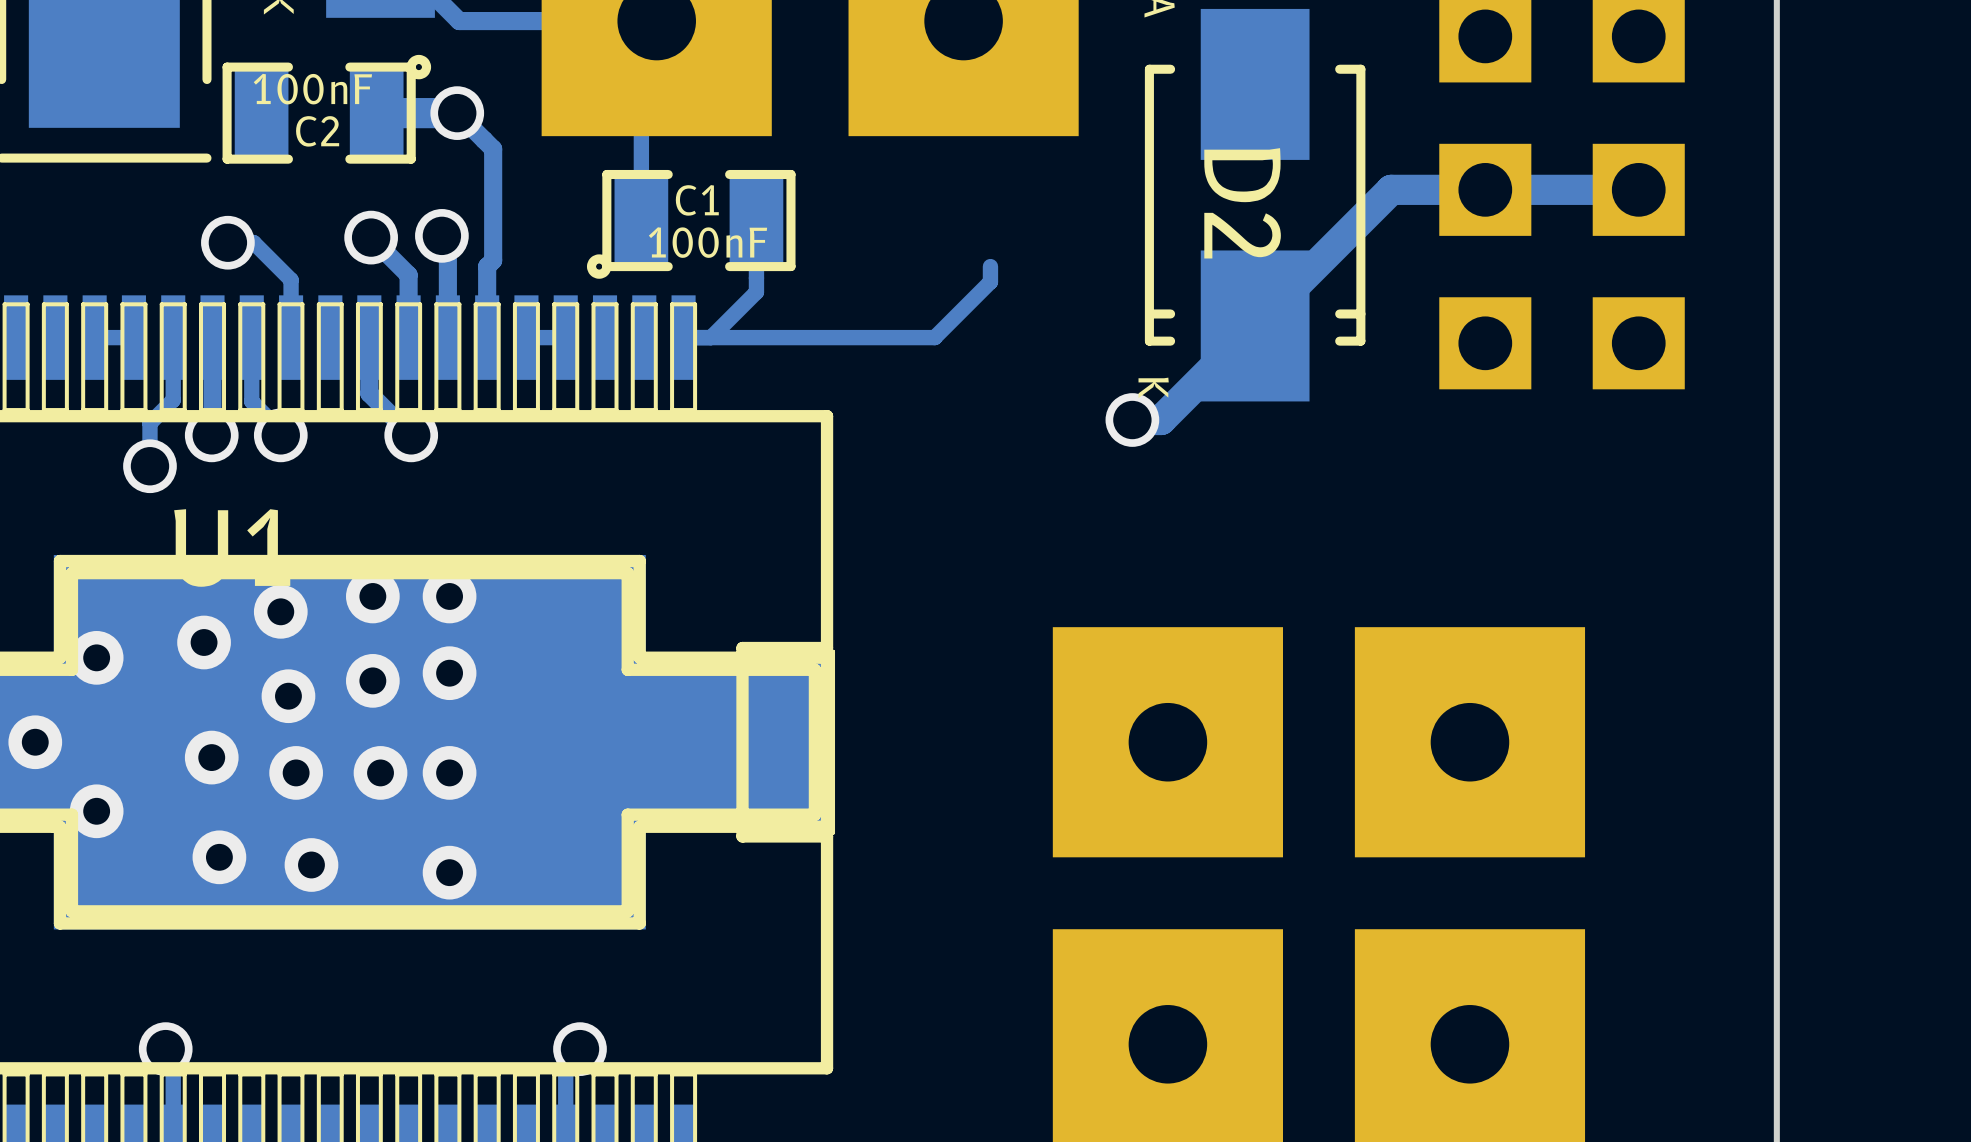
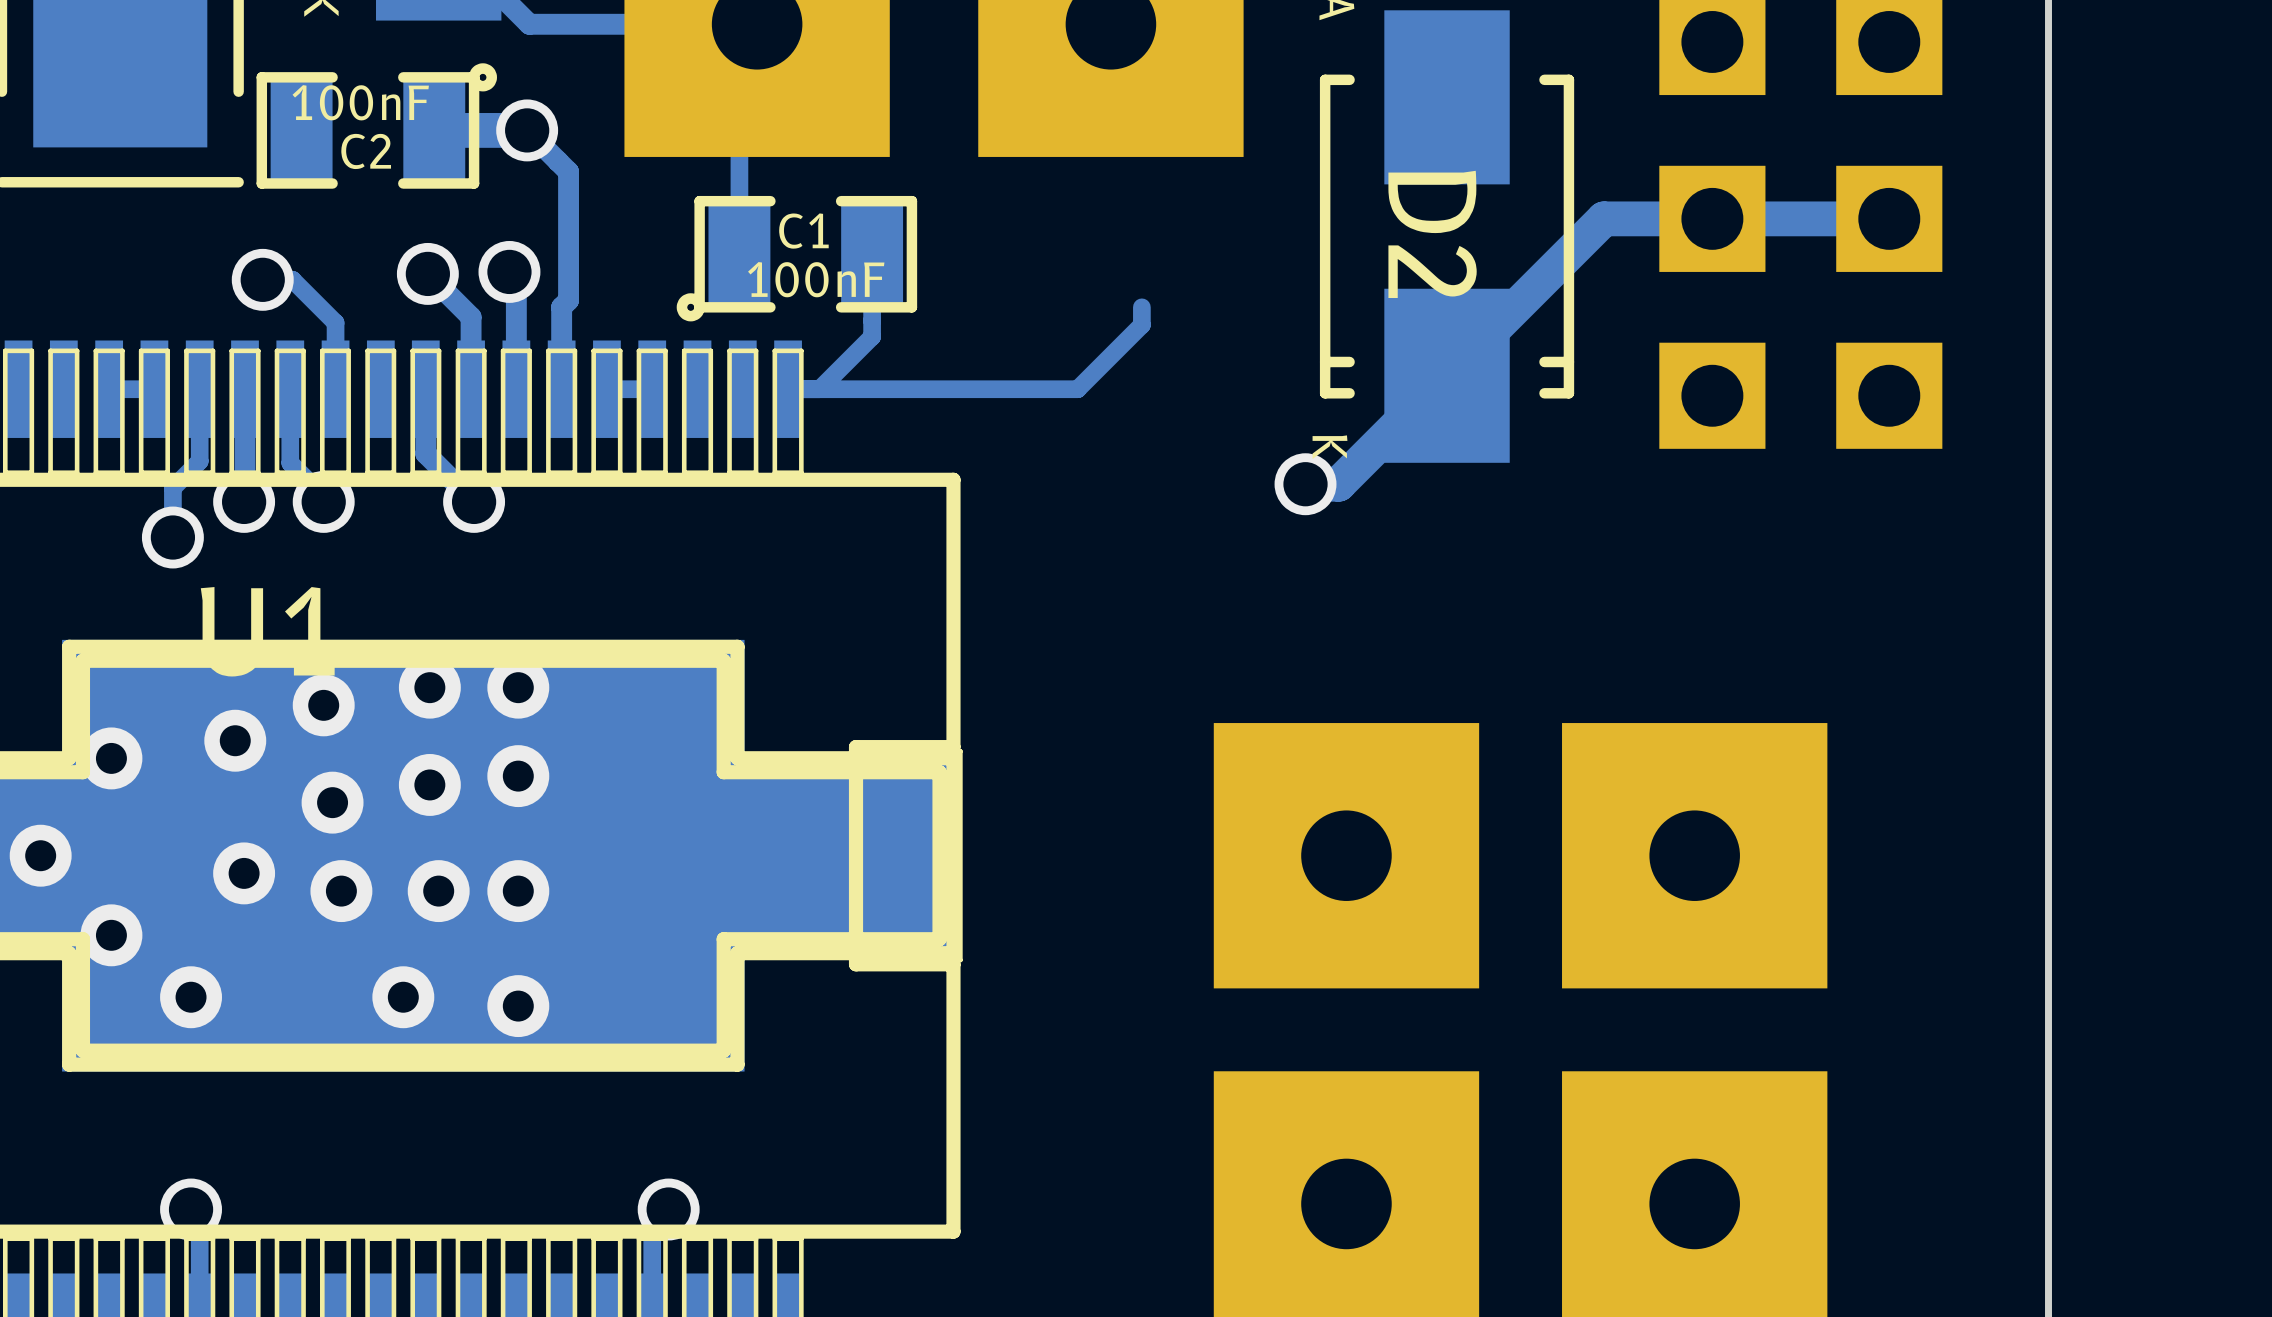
via position: (219, 857) -> (191, 997)
via position: (311, 864) -> (403, 997)

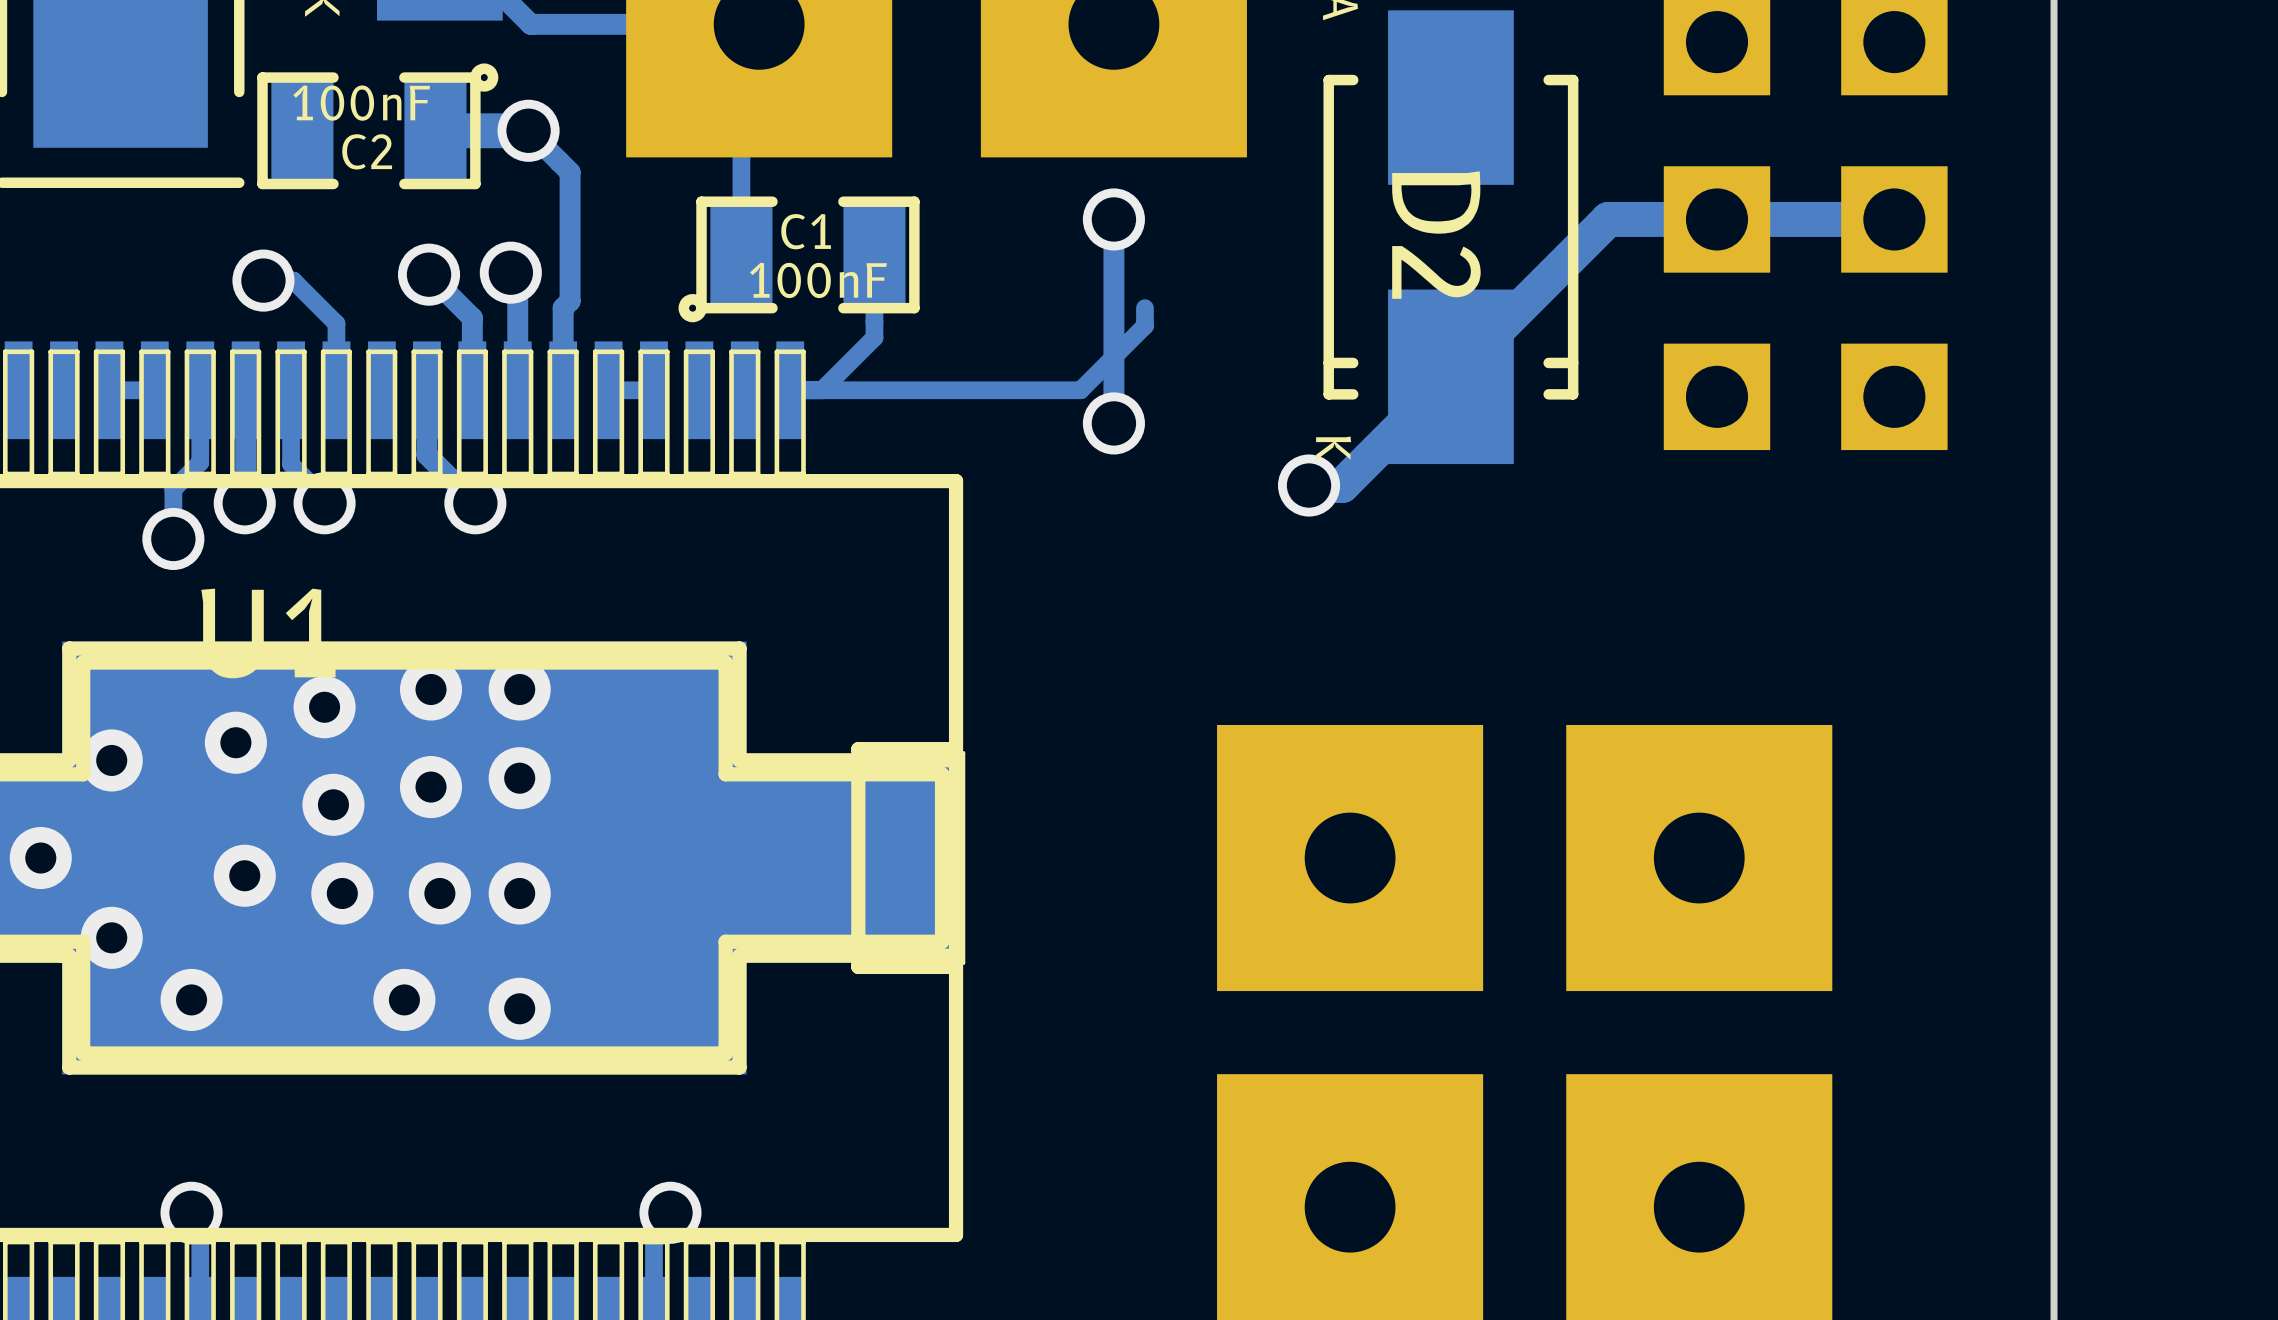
track: none -> (1113, 219) (1113, 423)
via: none -> (1113, 219)
via: none -> (1113, 423)

